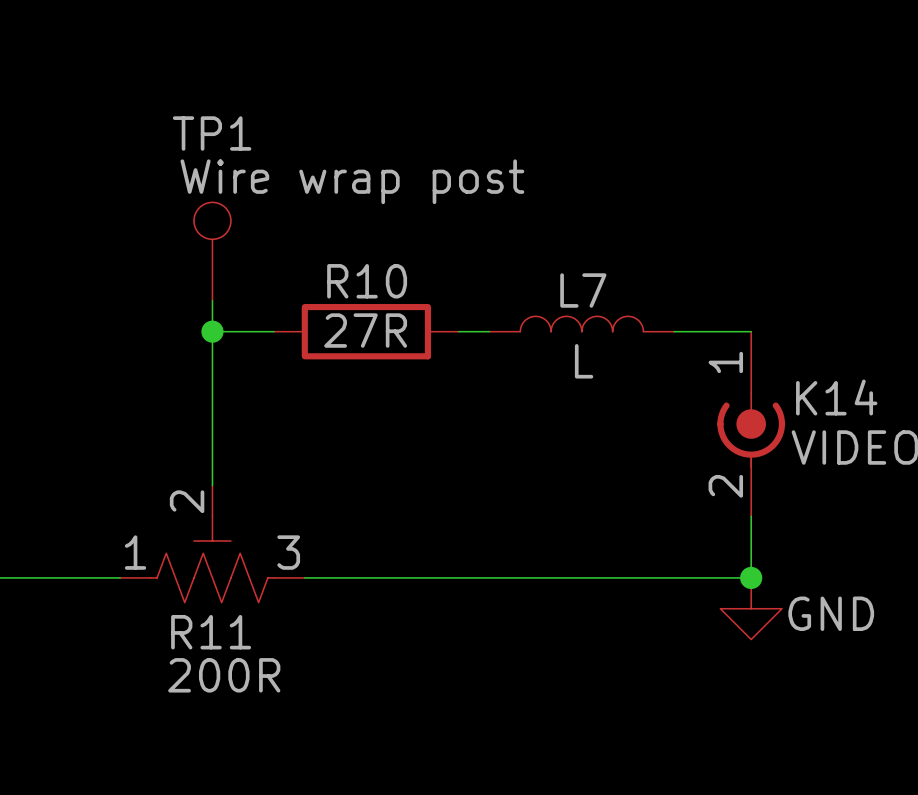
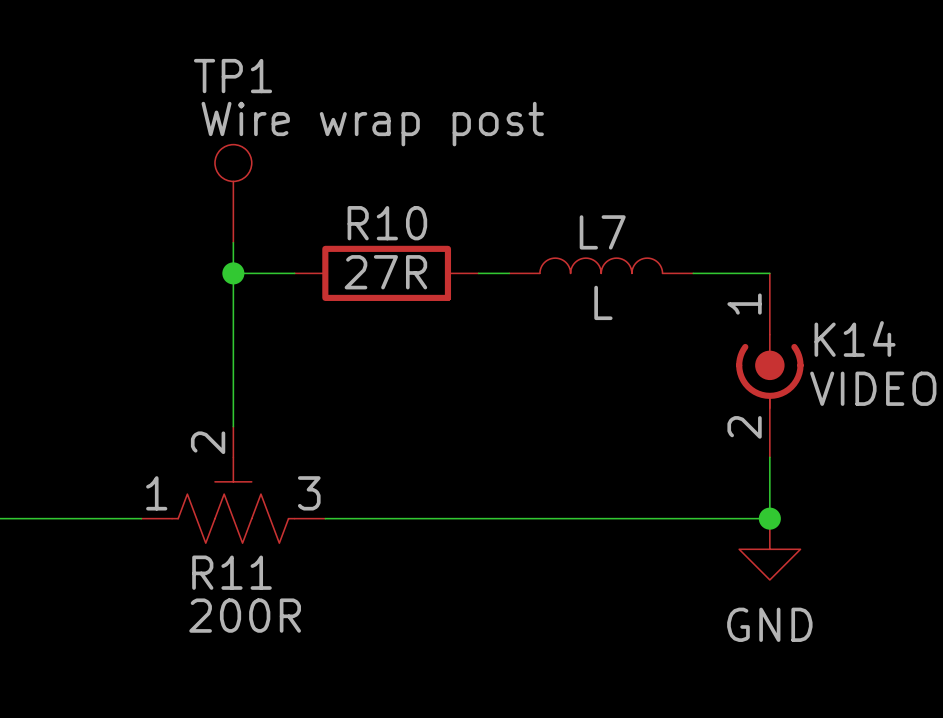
power symbol text position: GND (831, 613) -> GND (769, 624)

